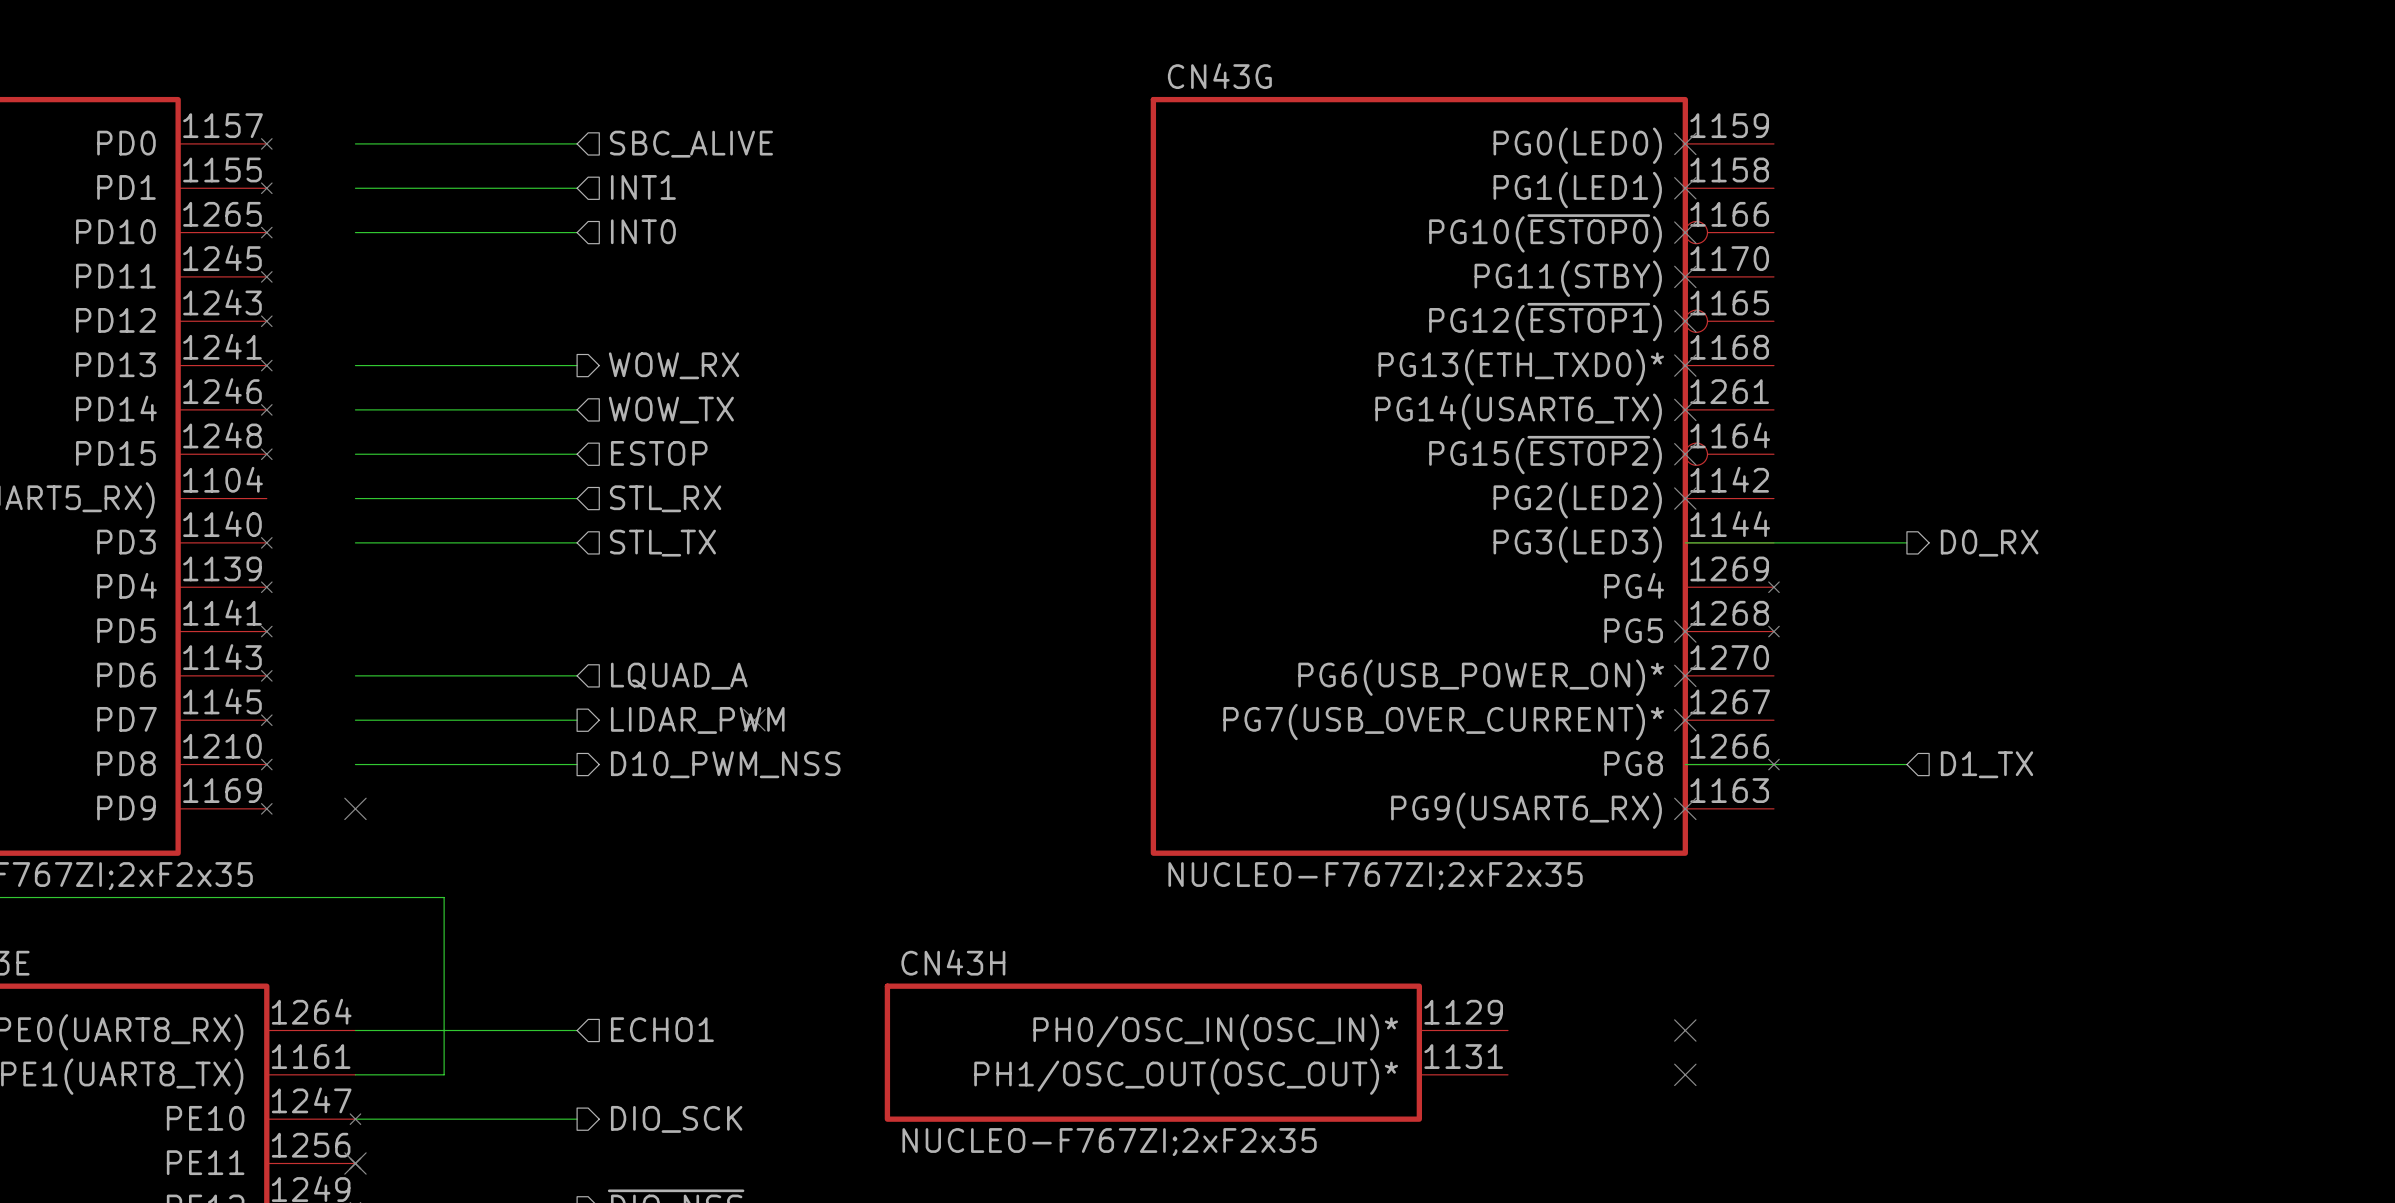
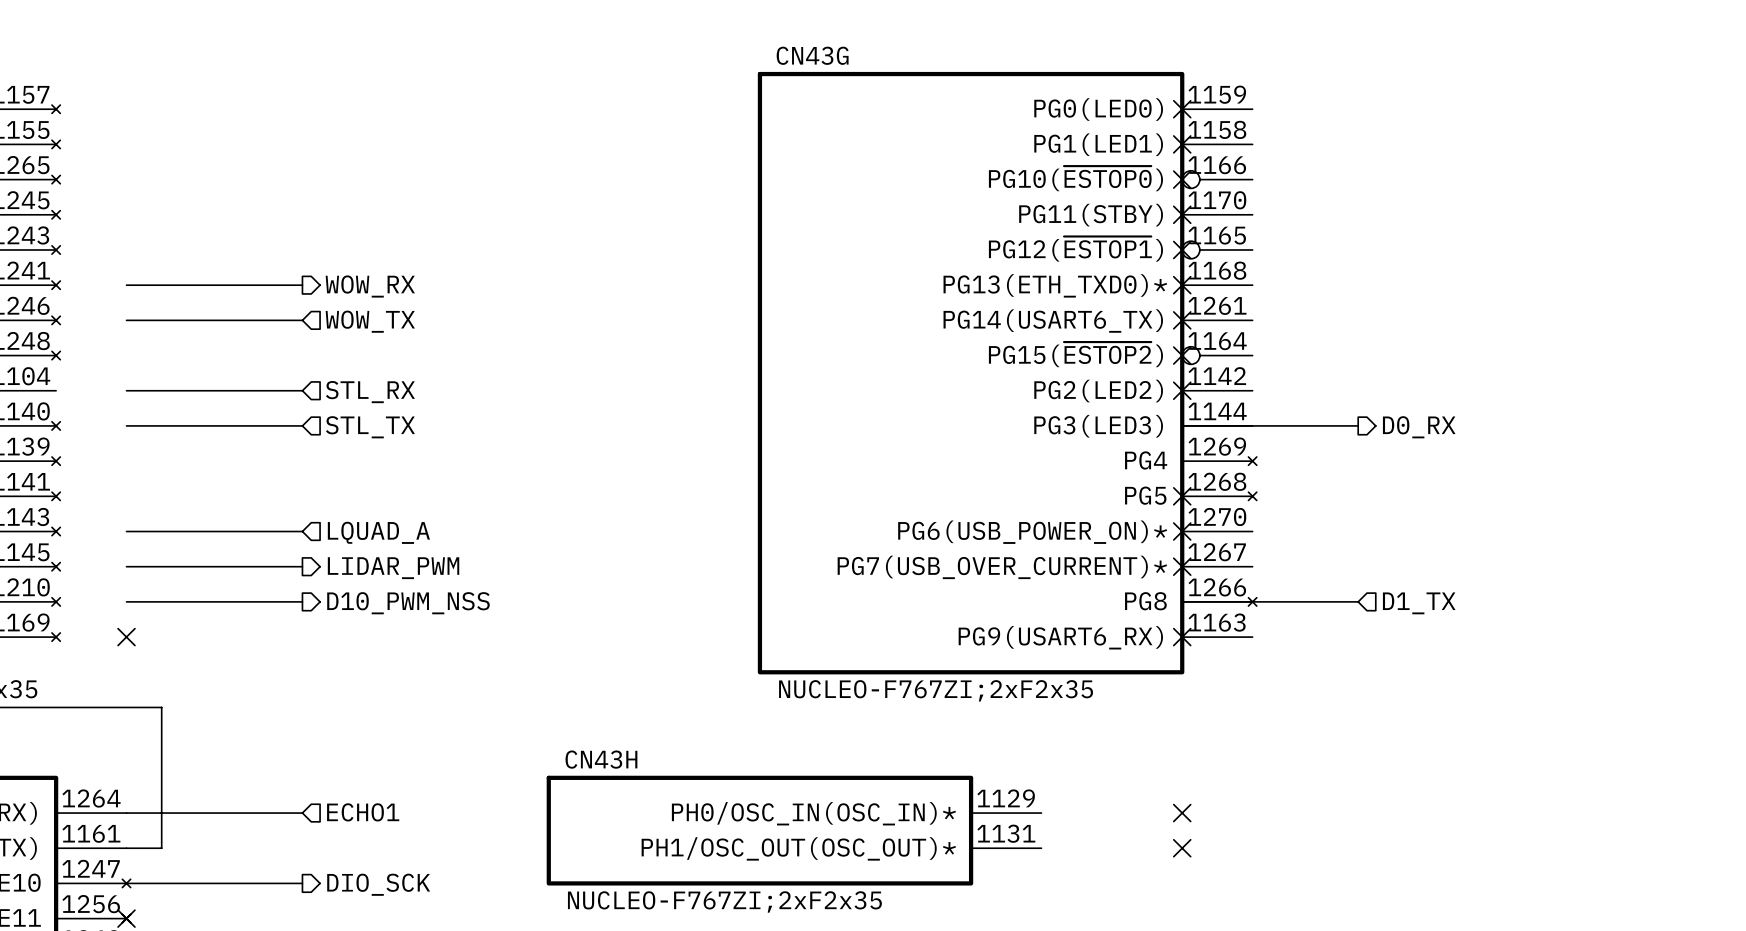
wire: (355, 143) (577, 143) -> none
hierarchical label: SBC_ALIVE (691, 144) -> none
hierarchical label: INT1 (643, 187) -> none
wire: (355, 188) (577, 188) -> none
hierarchical label: INT0 (643, 231) -> none
wire: (355, 232) (577, 232) -> none
hierarchical label: ESTOP (659, 453) -> none
wire: (355, 454) (577, 454) -> none
no-connect mark: (754, 720) -> none
wire: (399, 897) (444, 897) (444, 1074) (399, 1074) -> (161, 707) (161, 848)

